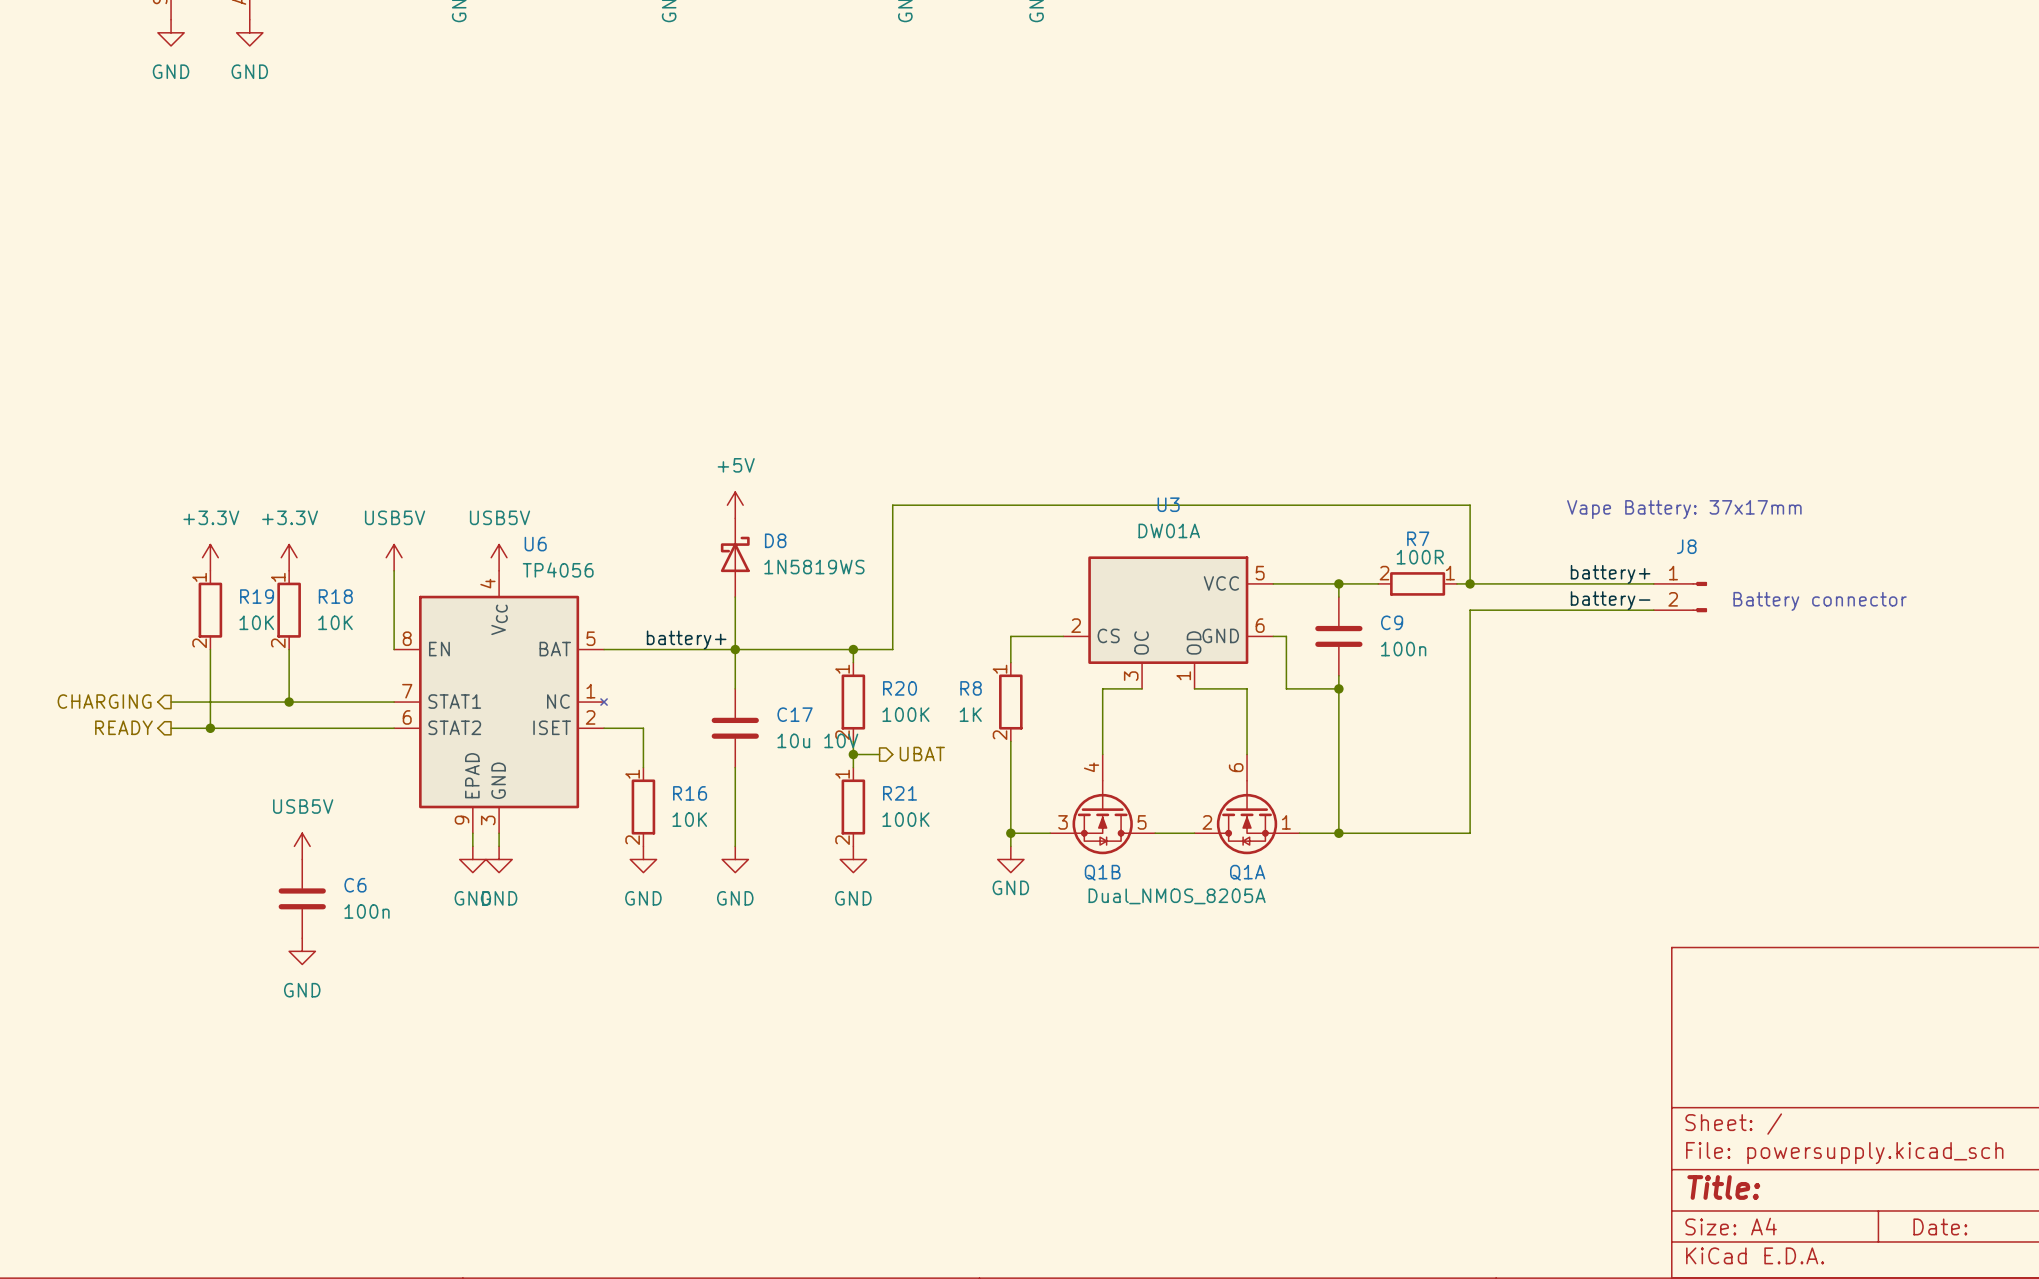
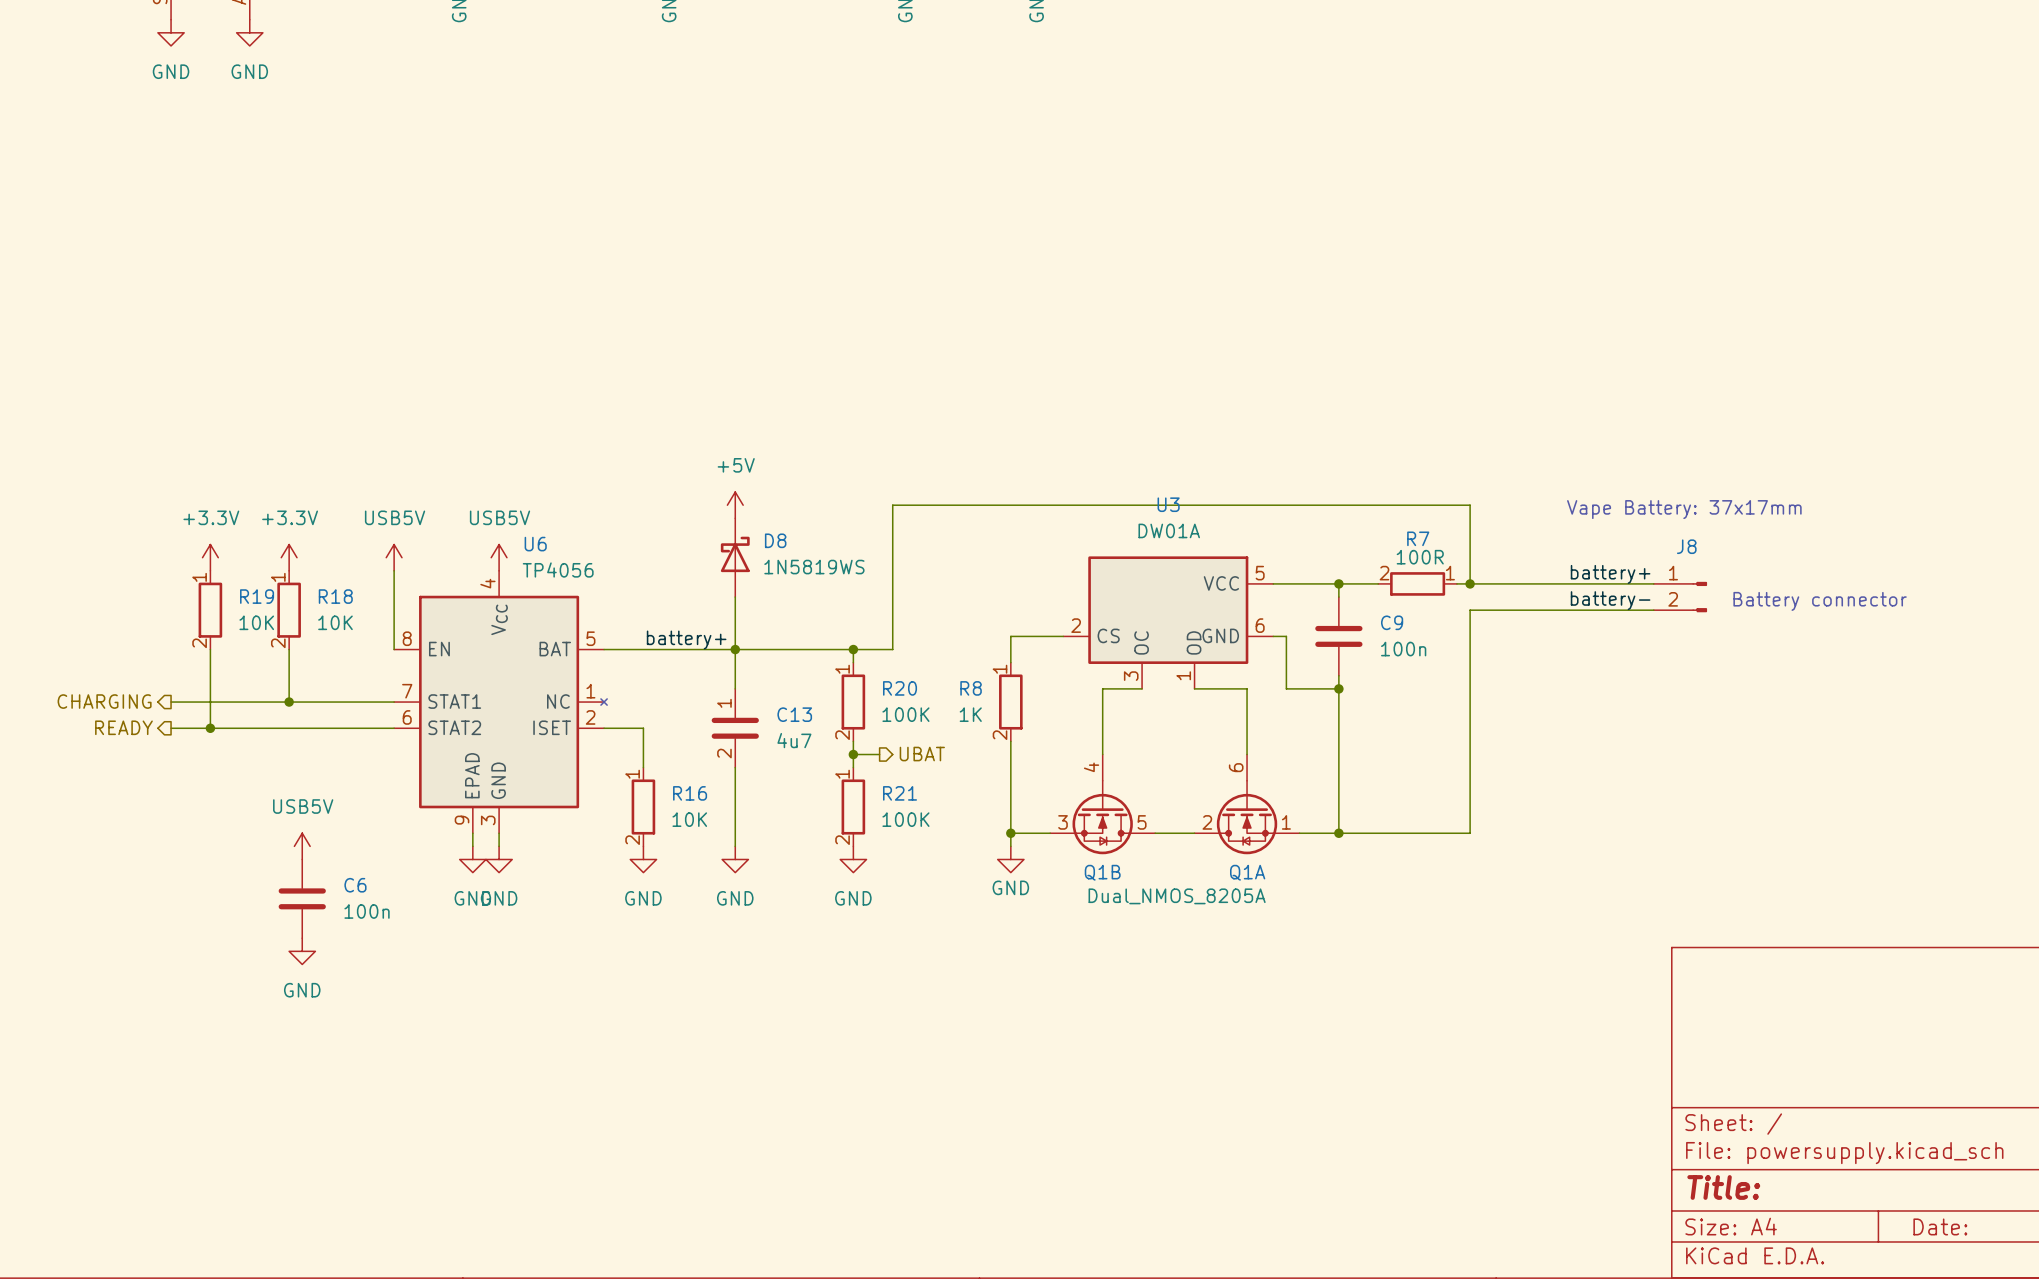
C17 pin number: none -> 1 (724, 703)
C17 name: C17 (795, 714) -> C13 (794, 714)
C17 value: 10u 10V (817, 740) -> 4u7 (794, 740)
C17 pin number: none -> 2 (724, 753)

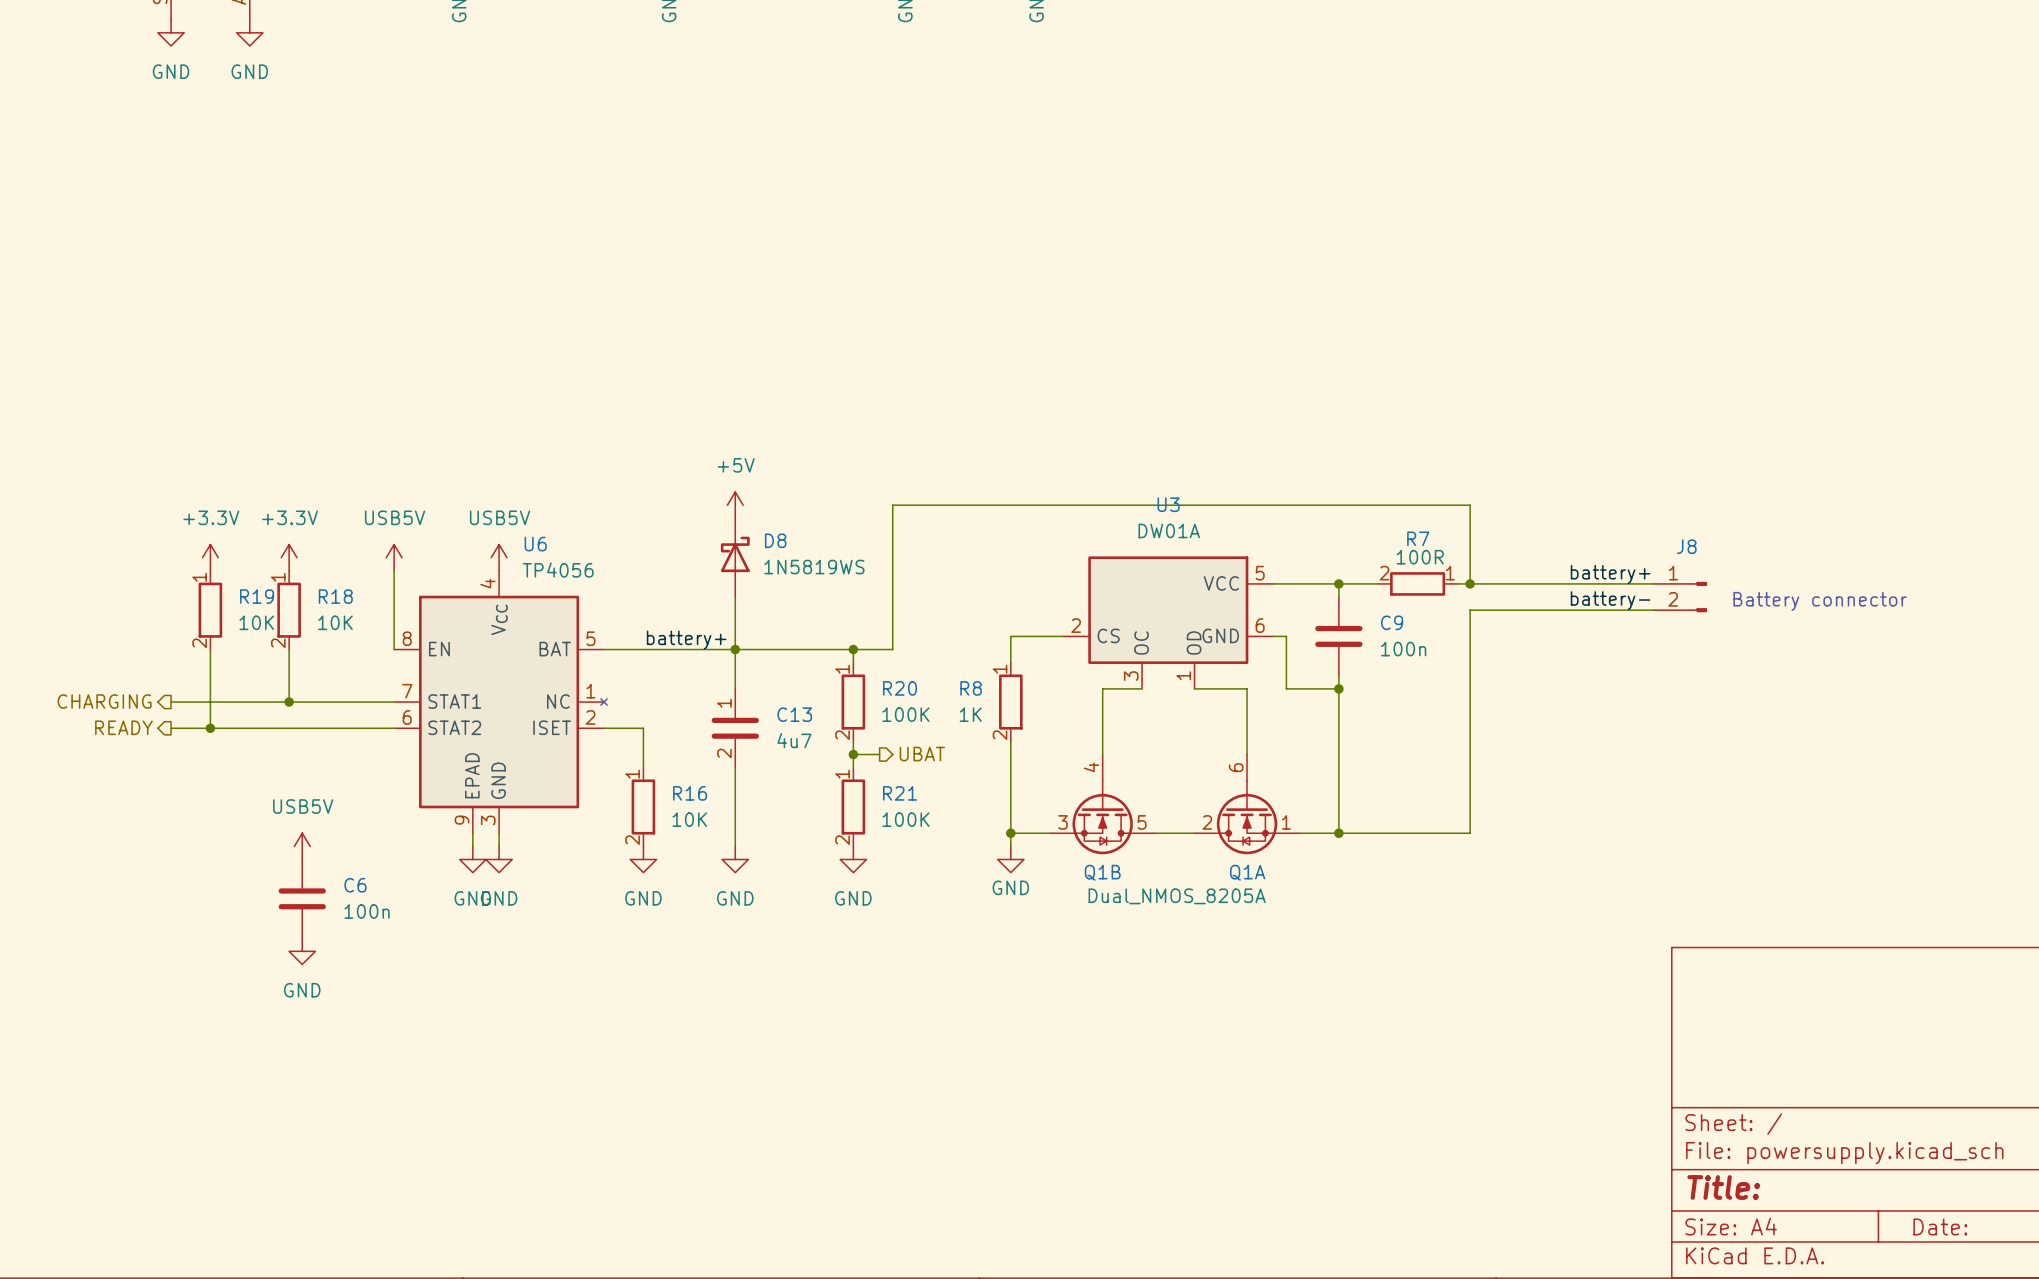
text: Vape Battery: 37x17mm (1684, 509) -> none

